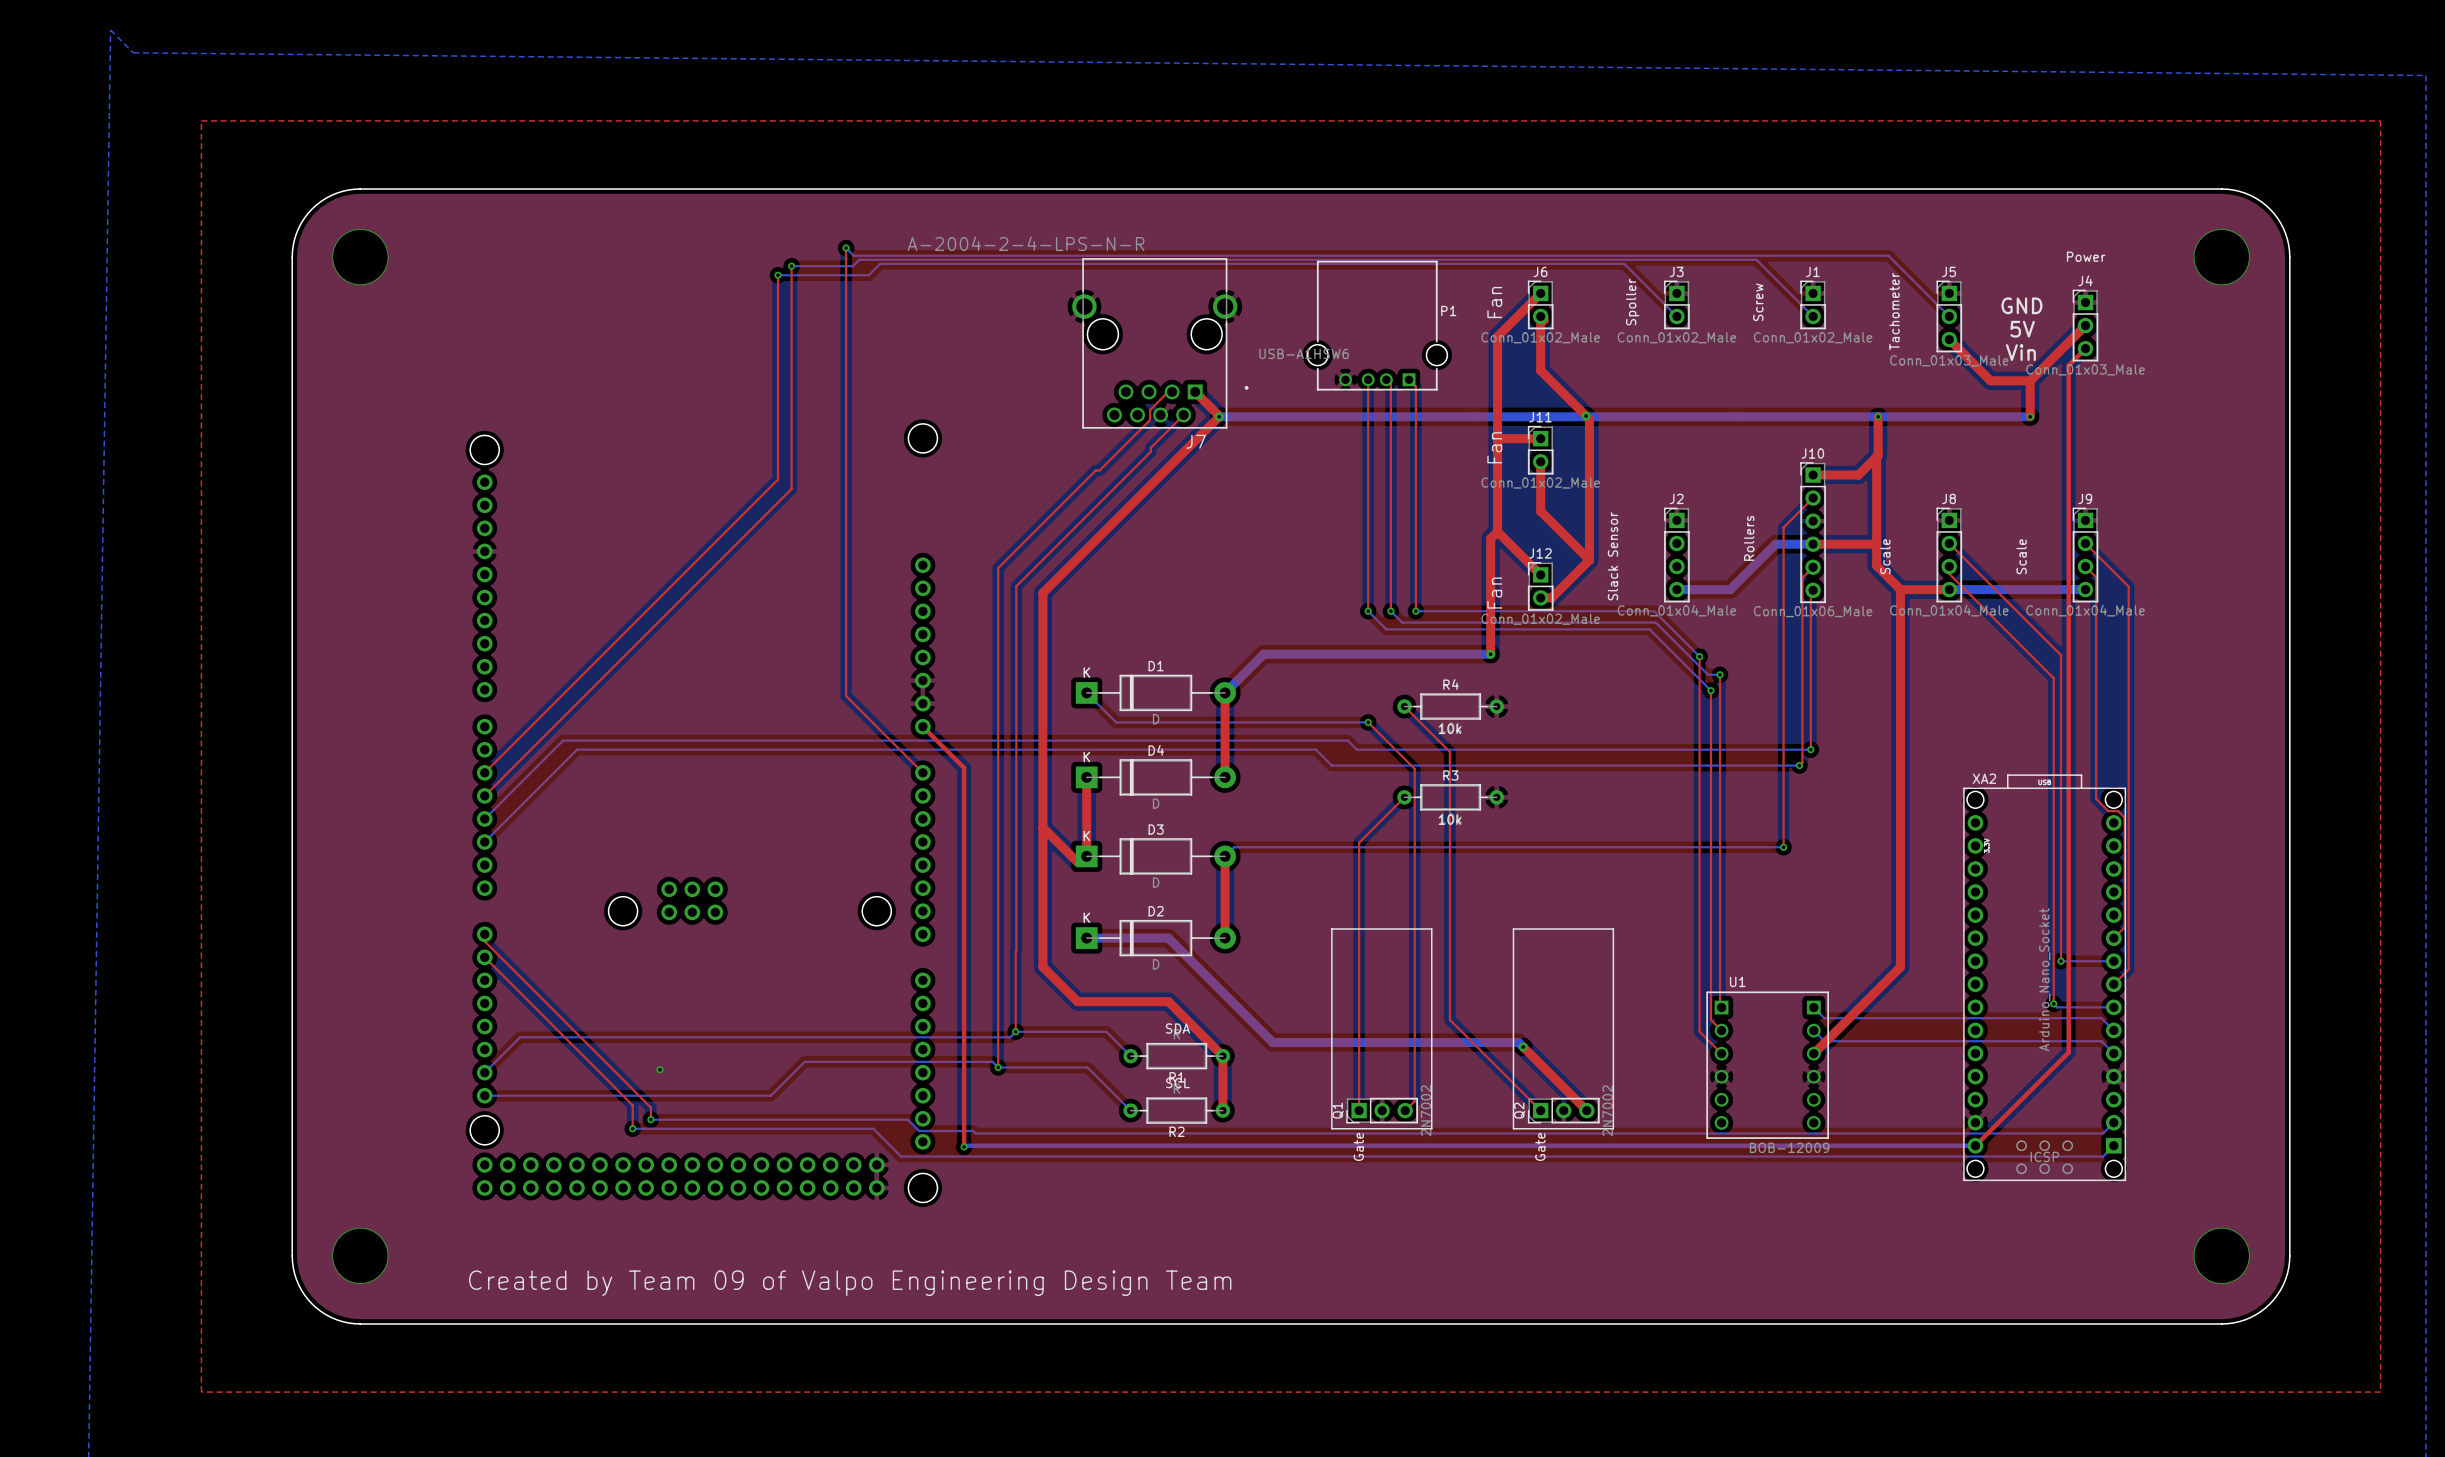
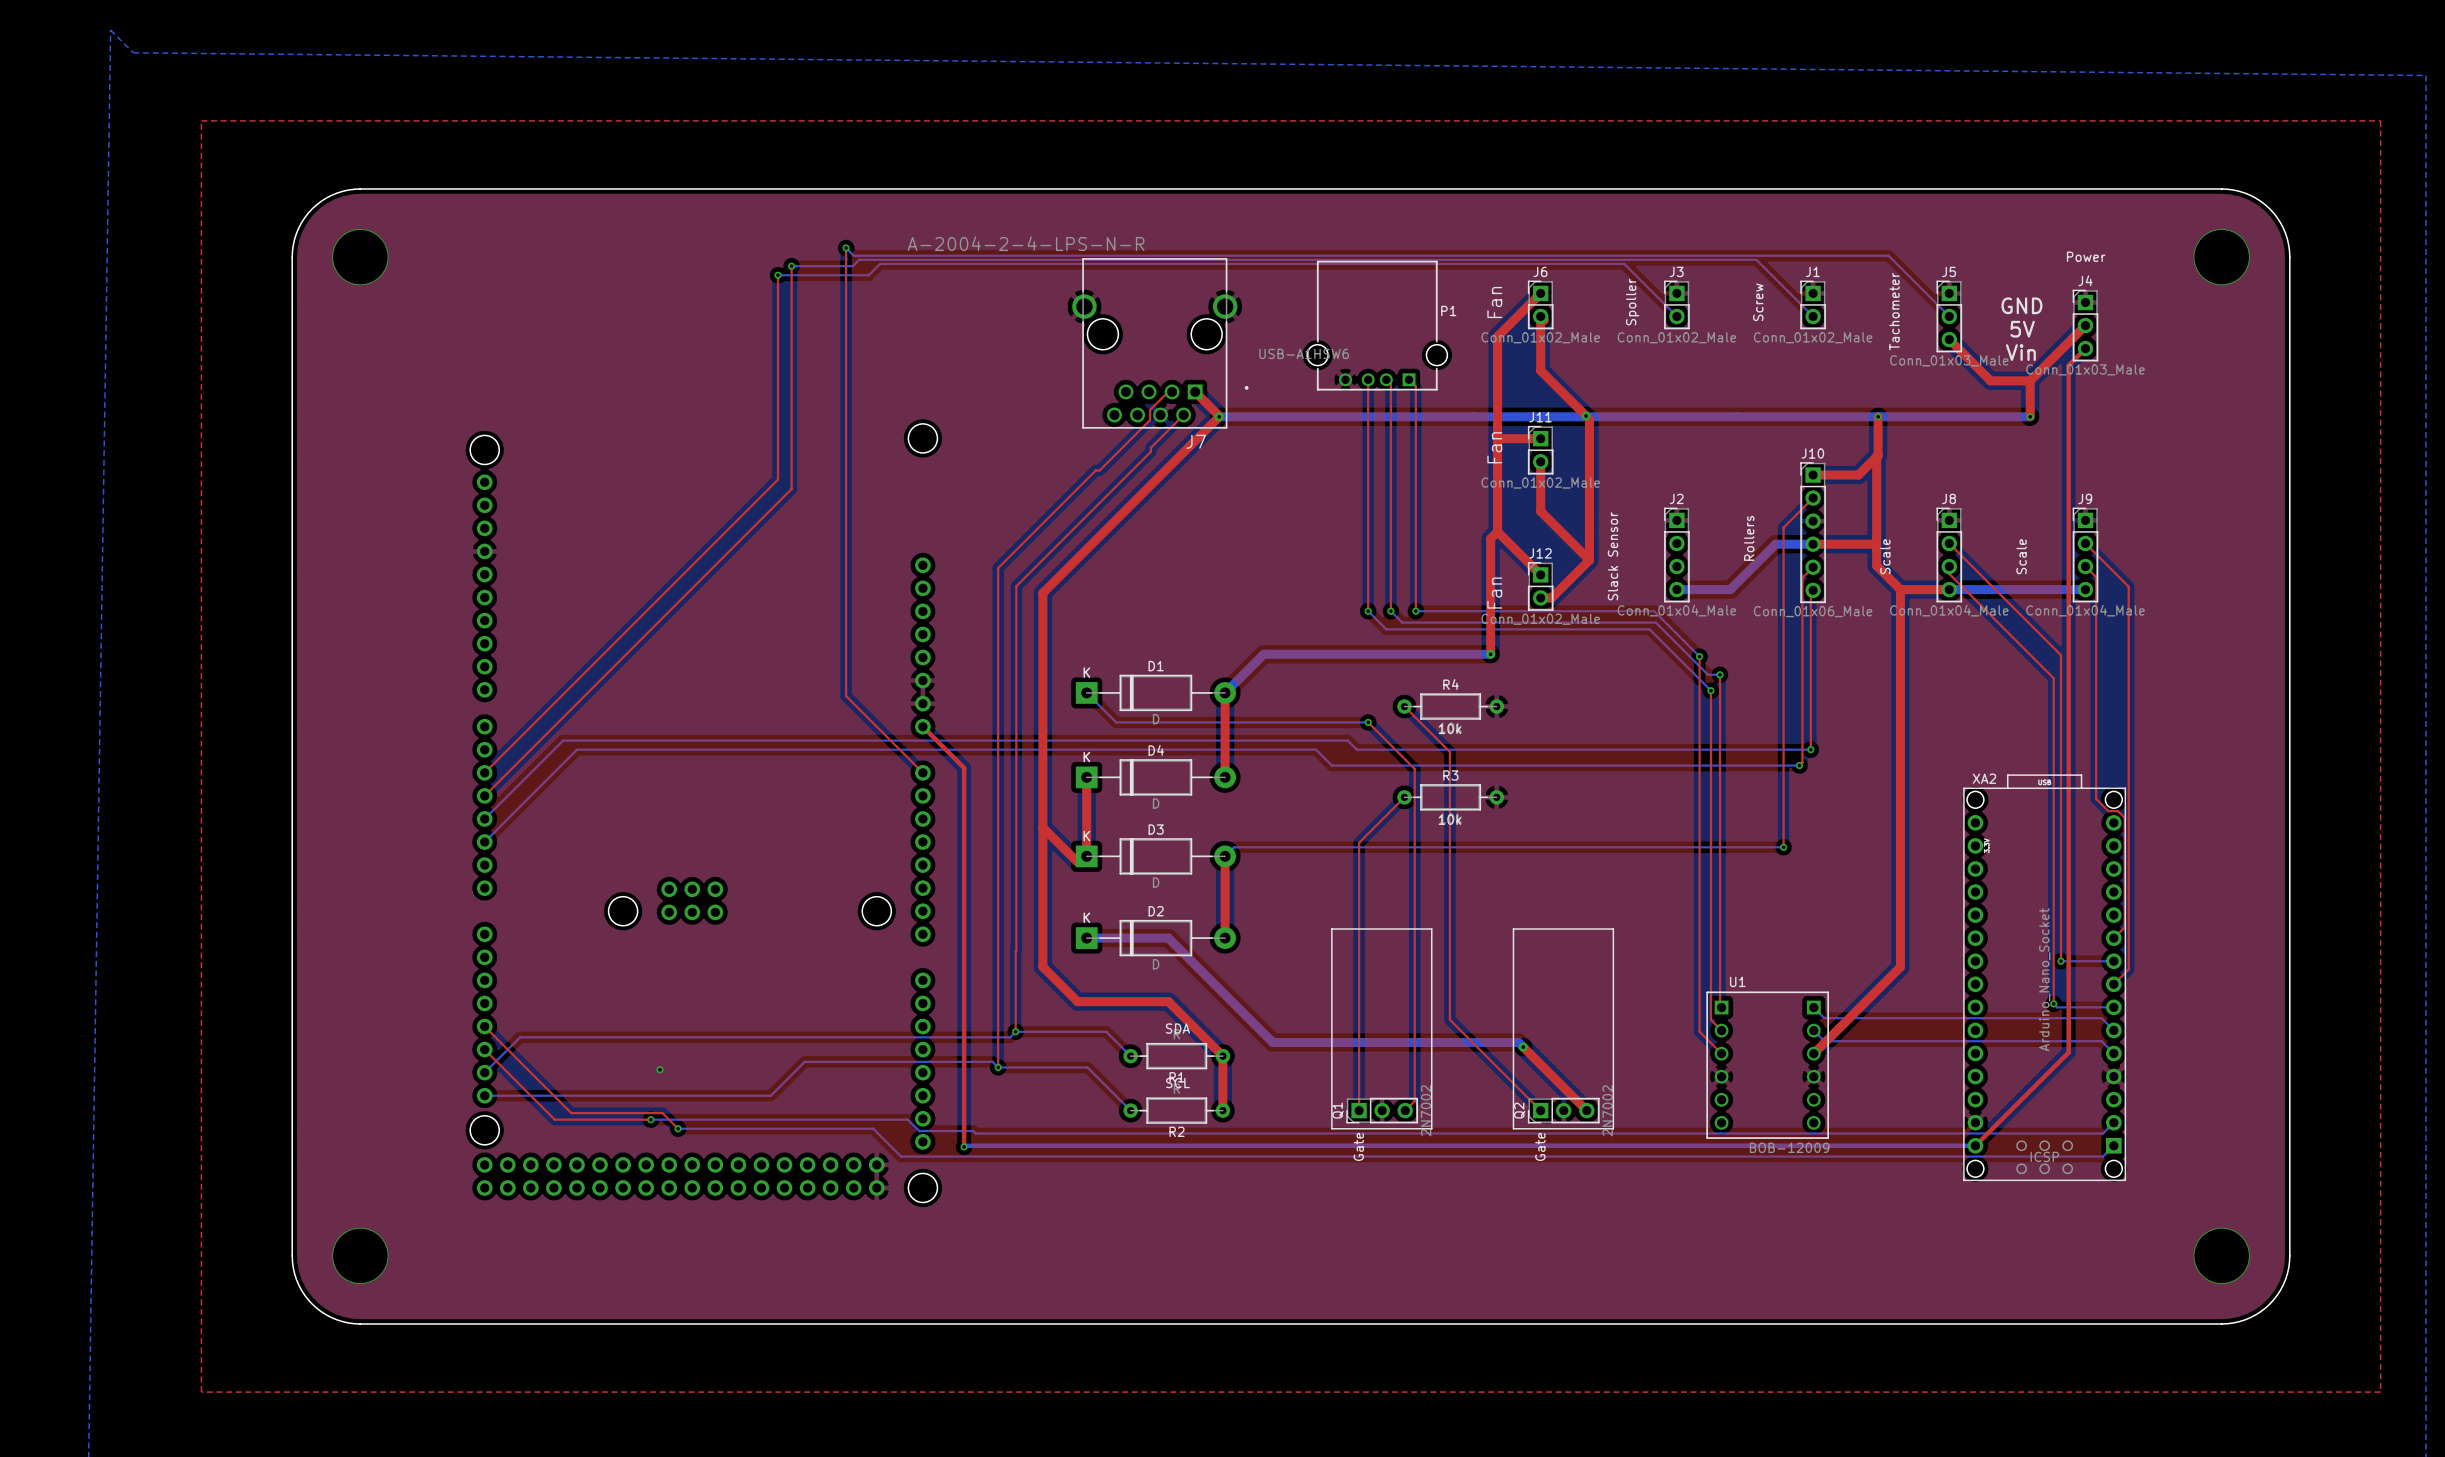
top track: (484, 934) (484, 941) (650, 1107) (650, 1119) -> (484, 1049) (554, 1119) (650, 1119)
top track: (484, 957) (632, 1105) (632, 1128) -> none
top track: none -> (484, 1026) (571, 1113) (662, 1113) (678, 1128)
bottom track: (632, 1128) (678, 1128) -> none
via position: (632, 1128) -> (678, 1128)
text: Created by Team 09 of Valpo Engineering Design Team (850, 1283) -> none

